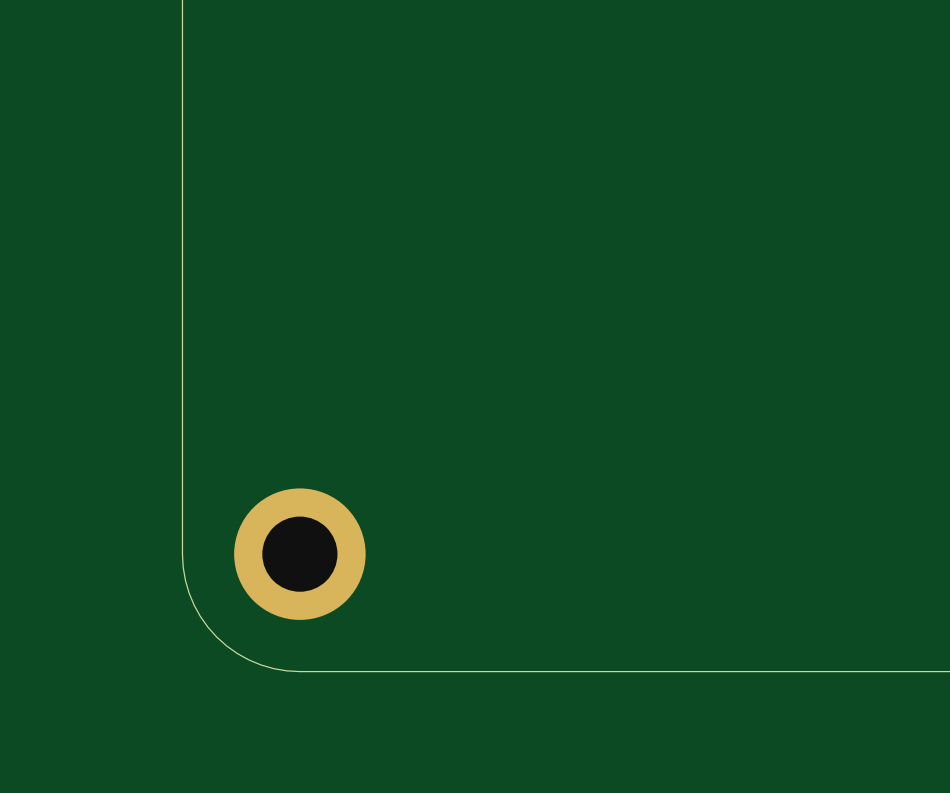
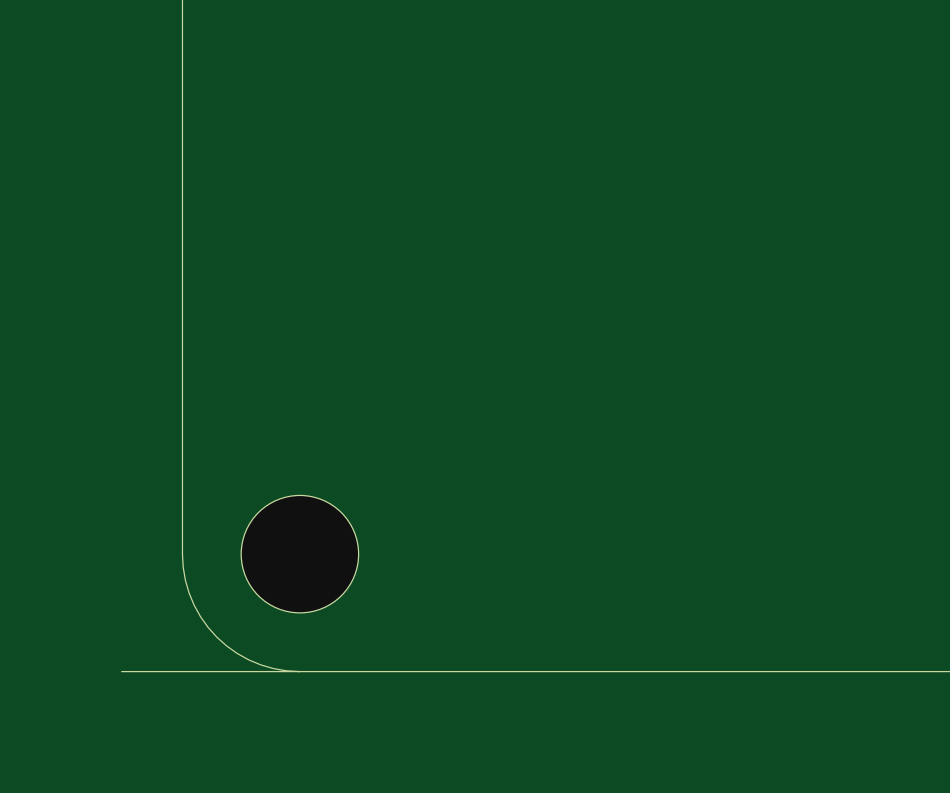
part footprint: [234, 488, 366, 620] -> [241, 495, 359, 613]
board edge: none -> (299, 671) (121, 671)

